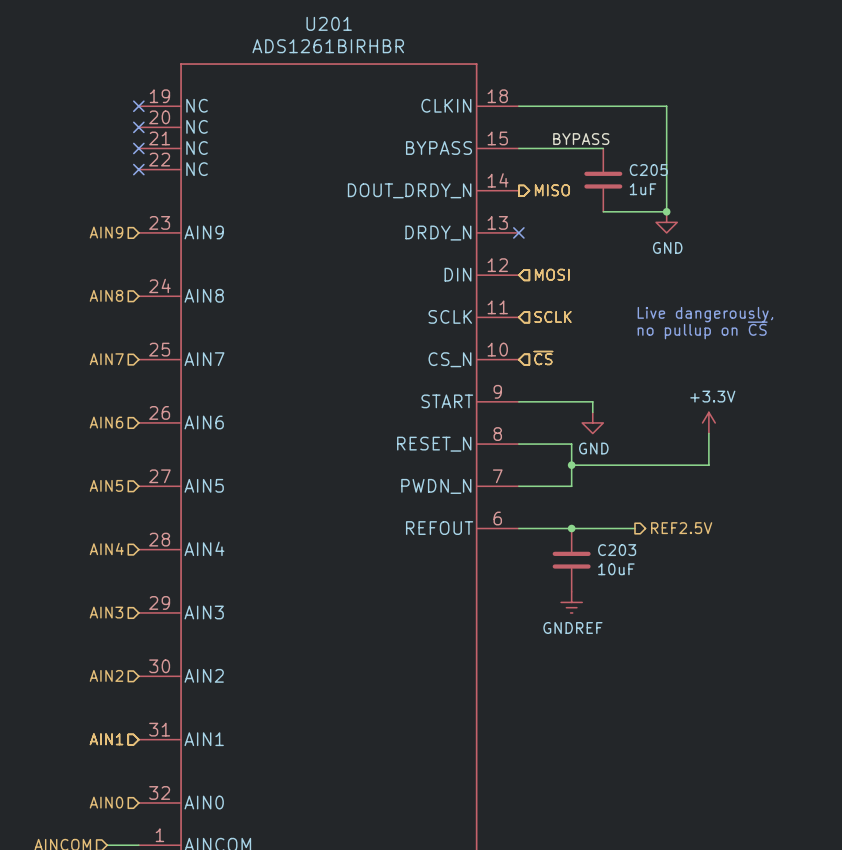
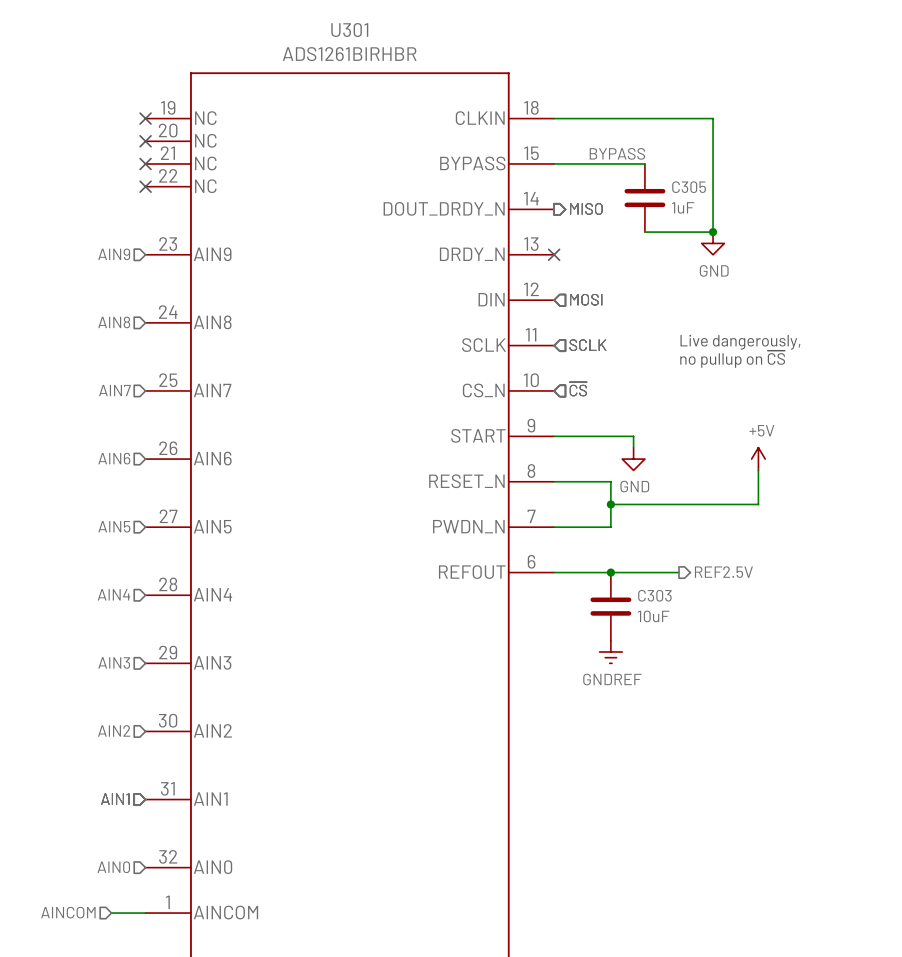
U201 name: U201 (329, 23) -> U301 (349, 30)
C205 name: C205 (648, 170) -> C305 (689, 187)
power symbol: +3.3V (708, 422) -> +5V (758, 459)
C203 name: C203 (617, 550) -> C303 (654, 595)

